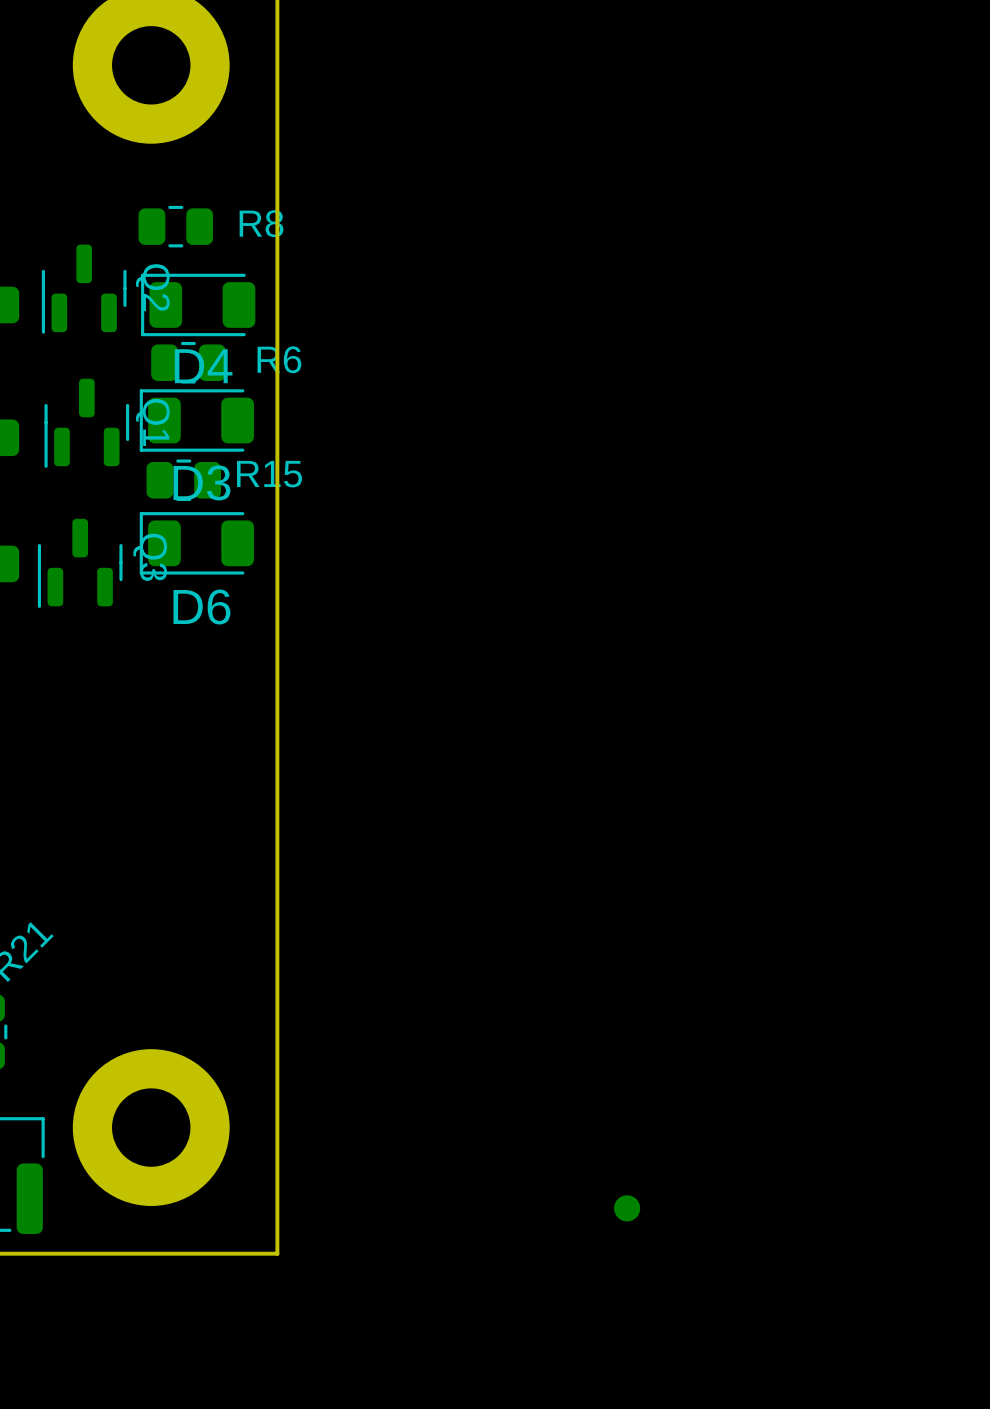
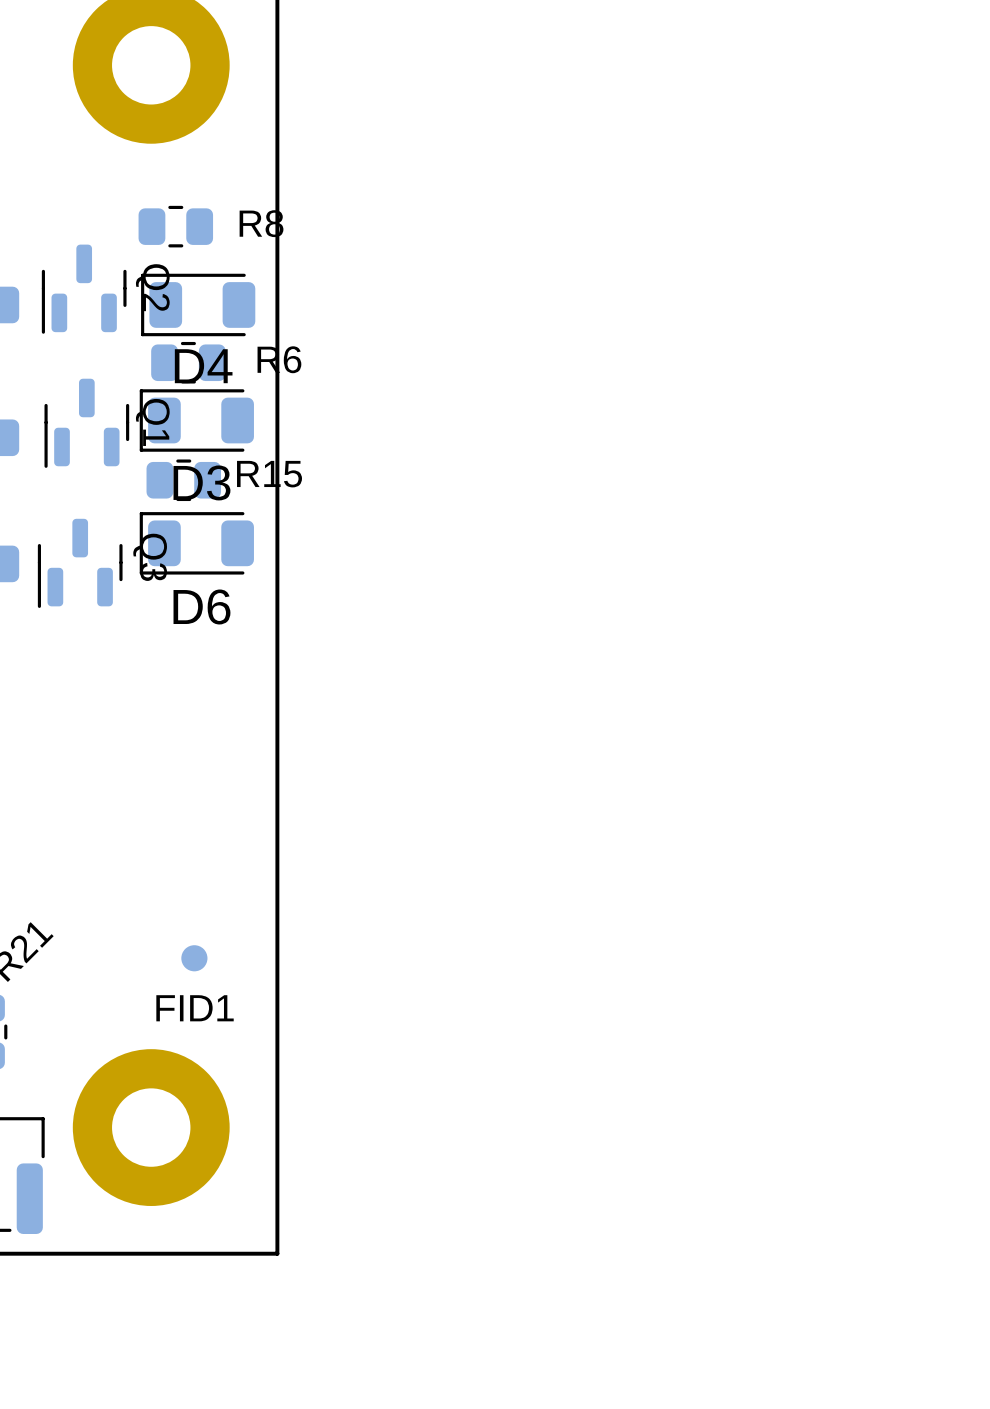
FID1: none -> (194, 958)
part: (627, 1208) -> none

